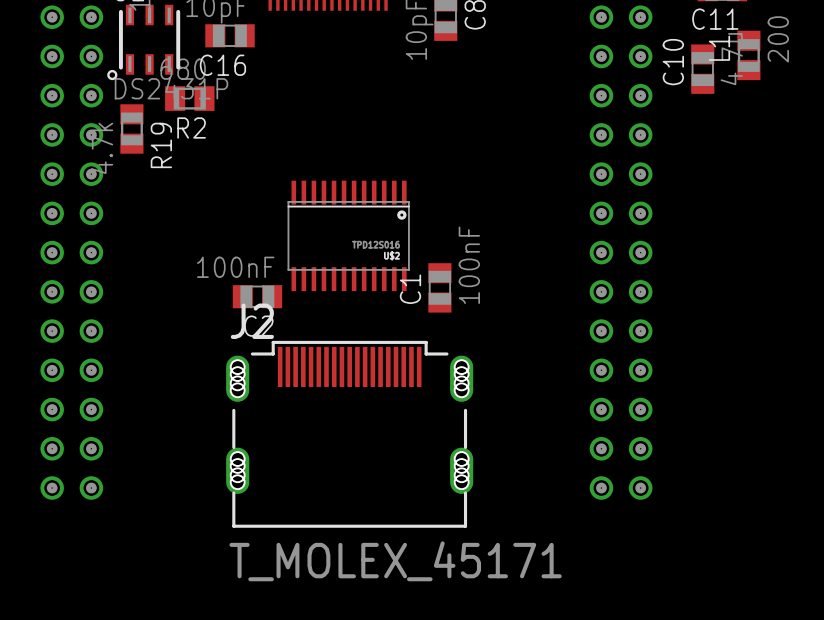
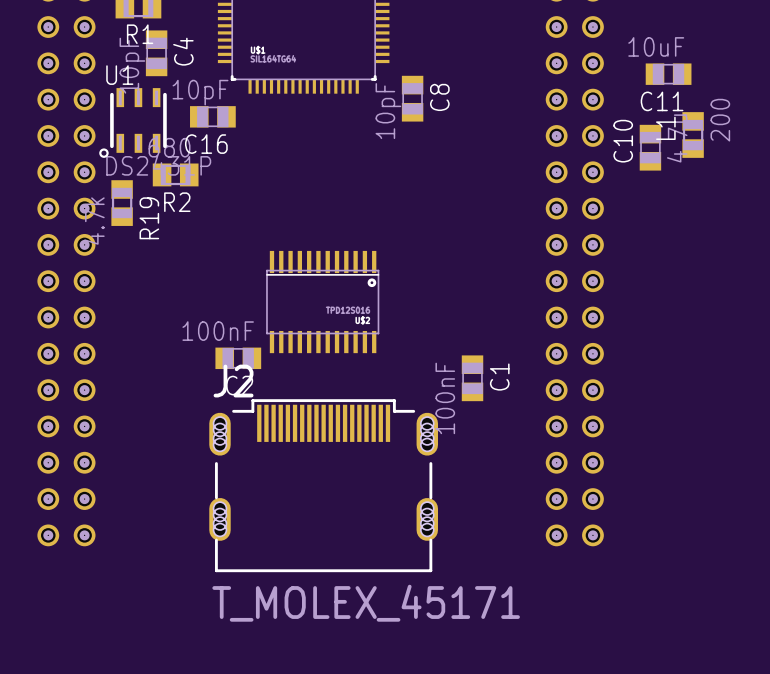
C1 value position: 100nF (469, 265) -> 100nF (445, 398)
C1 position: (439, 287) -> (472, 378)
C1 name position: C1 (410, 289) -> C1 (499, 377)

